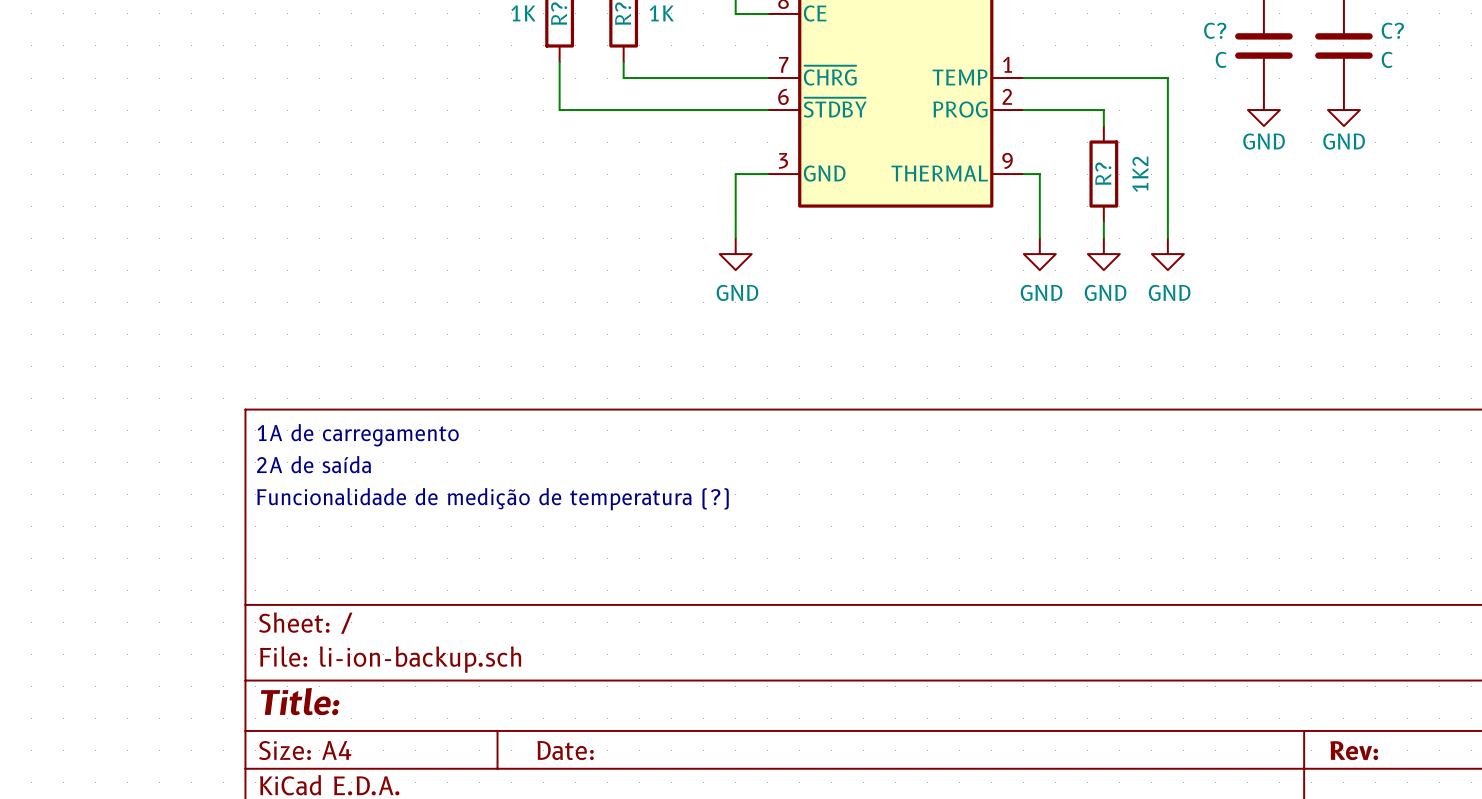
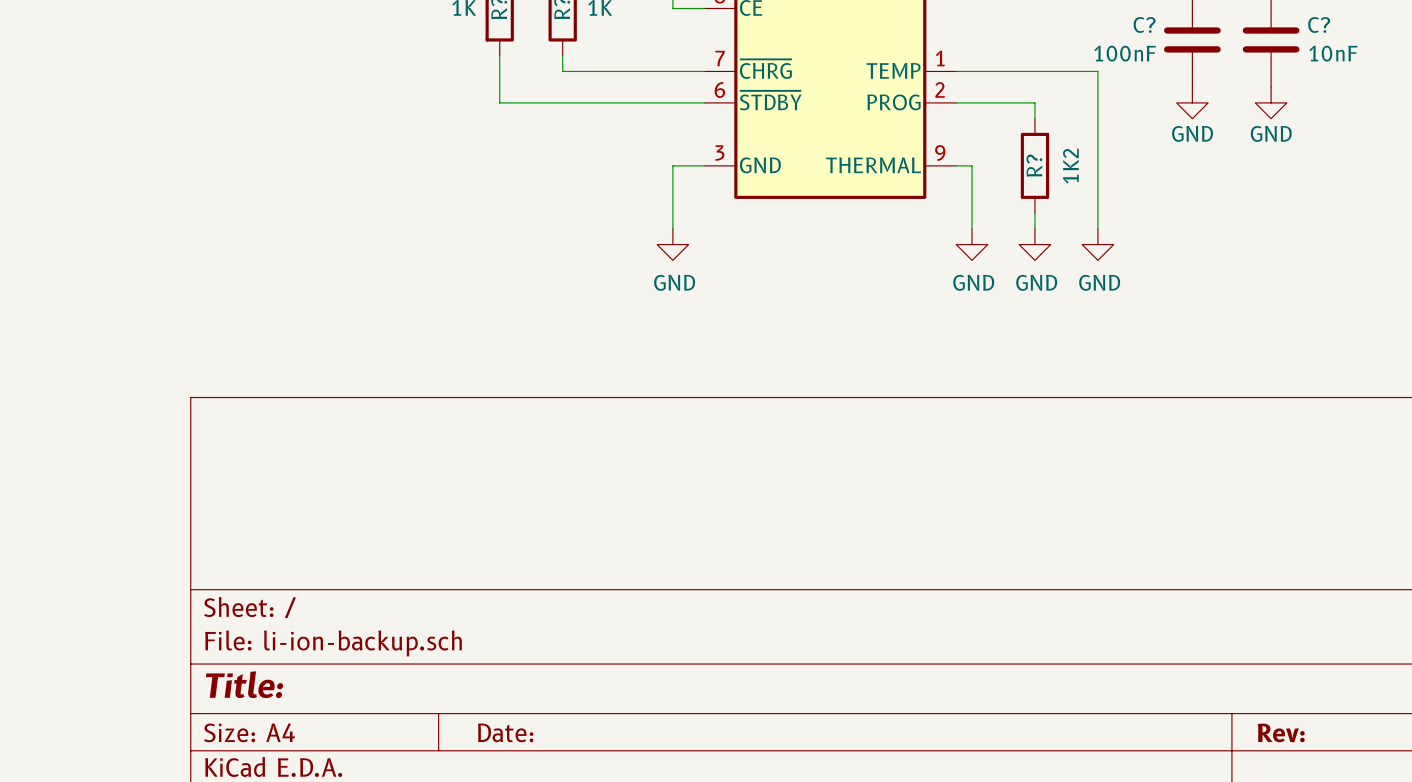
C? value: C (1221, 59) -> 100nF (1125, 53)
C? value: C (1387, 59) -> 10nF (1333, 53)
text: 1A de carregamento (358, 435) -> none
text: 2A de saída (314, 464) -> none
text: Funcionalidade de medição de temperatura (?) (492, 499) -> none

